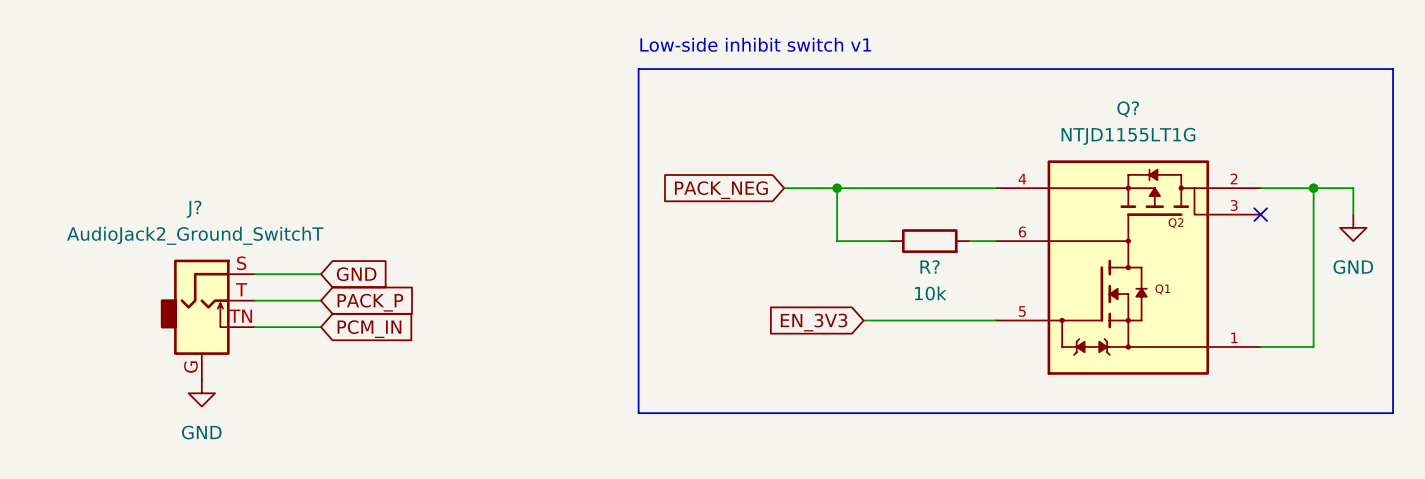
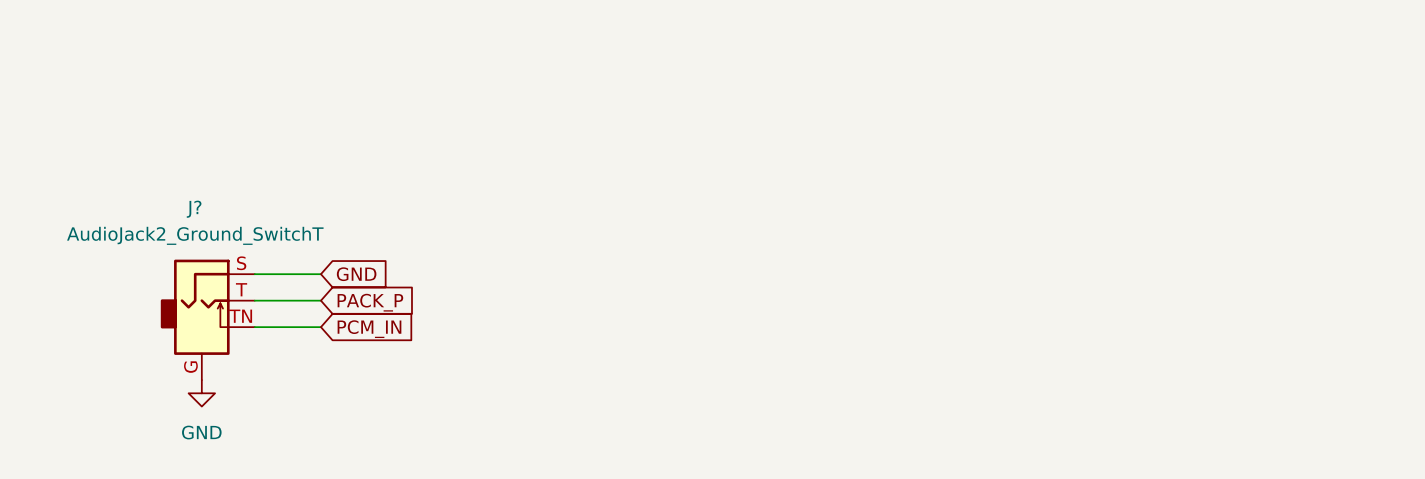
text: Low-side inhibit switch v1 (755, 44) -> none
line: (638, 69) (1393, 69) (1393, 413) (638, 413) (638, 69) -> none
wire: (784, 188) (995, 188) -> none
wire: (837, 188) (837, 241) (890, 241) -> none
junction: (837, 188) -> none
wire: (1260, 188) (1353, 188) (1353, 214) -> none
wire: (1313, 188) (1313, 346) (1260, 346) -> none
junction: (1313, 188) -> none
global label: PACK_NEG (721, 190) -> none
no-connect mark: (1260, 214) -> none
power symbol: GND (1353, 227) -> none
R?: 10k (929, 241) -> none
wire: (969, 241) (995, 241) -> none
Q?: NTJD1155LT1G (1128, 267) -> none
wire: (863, 320) (995, 320) -> none
global label: EN_3V3 (814, 322) -> none

